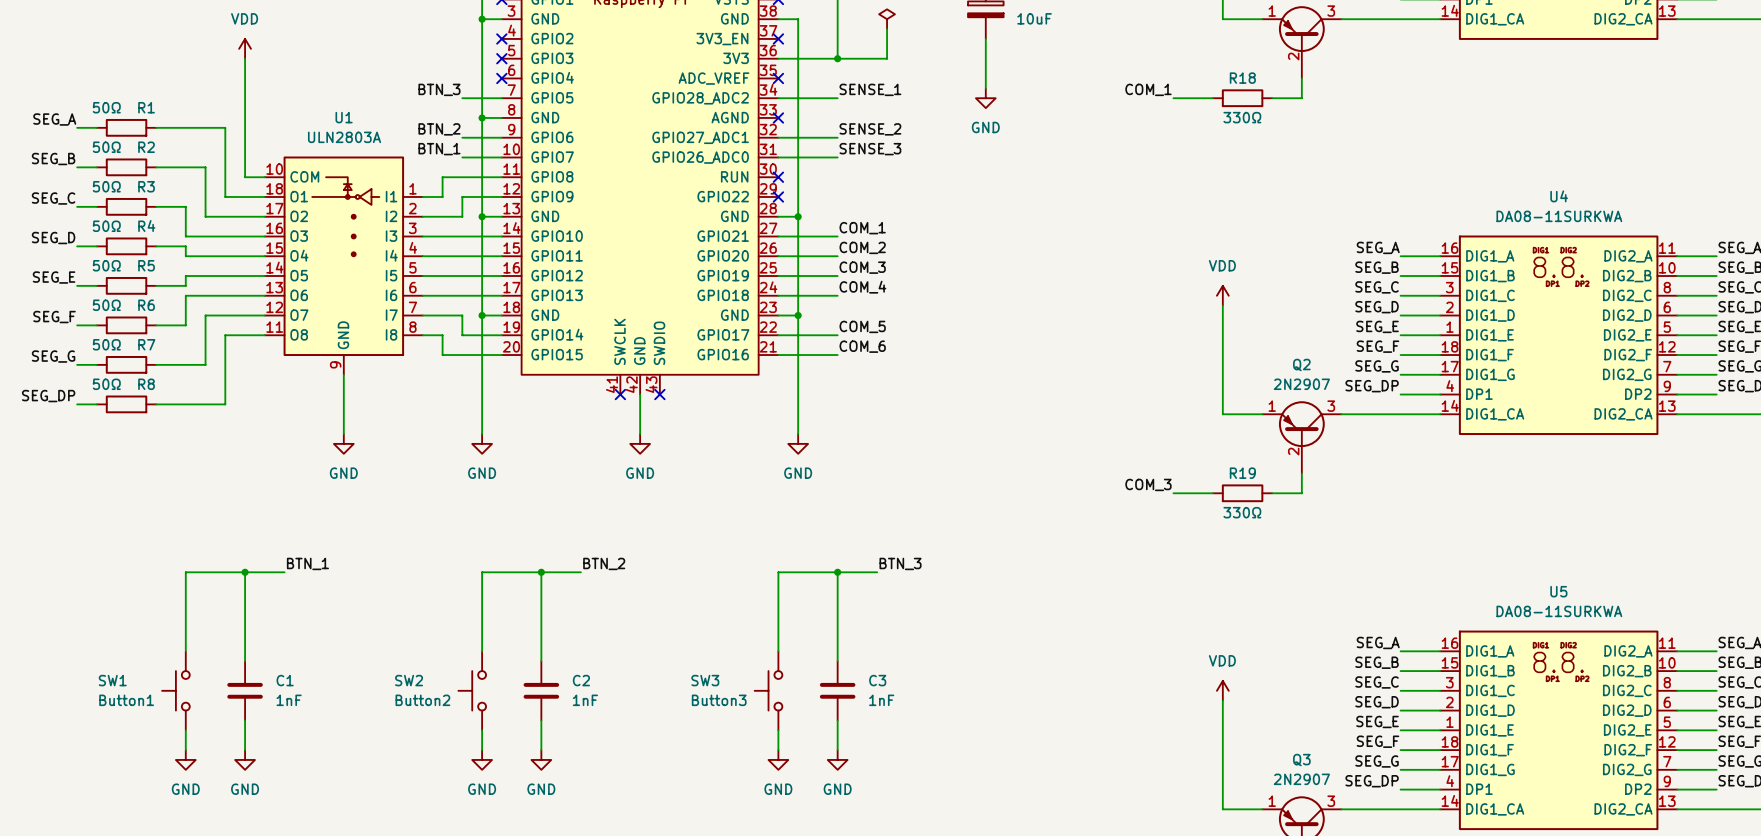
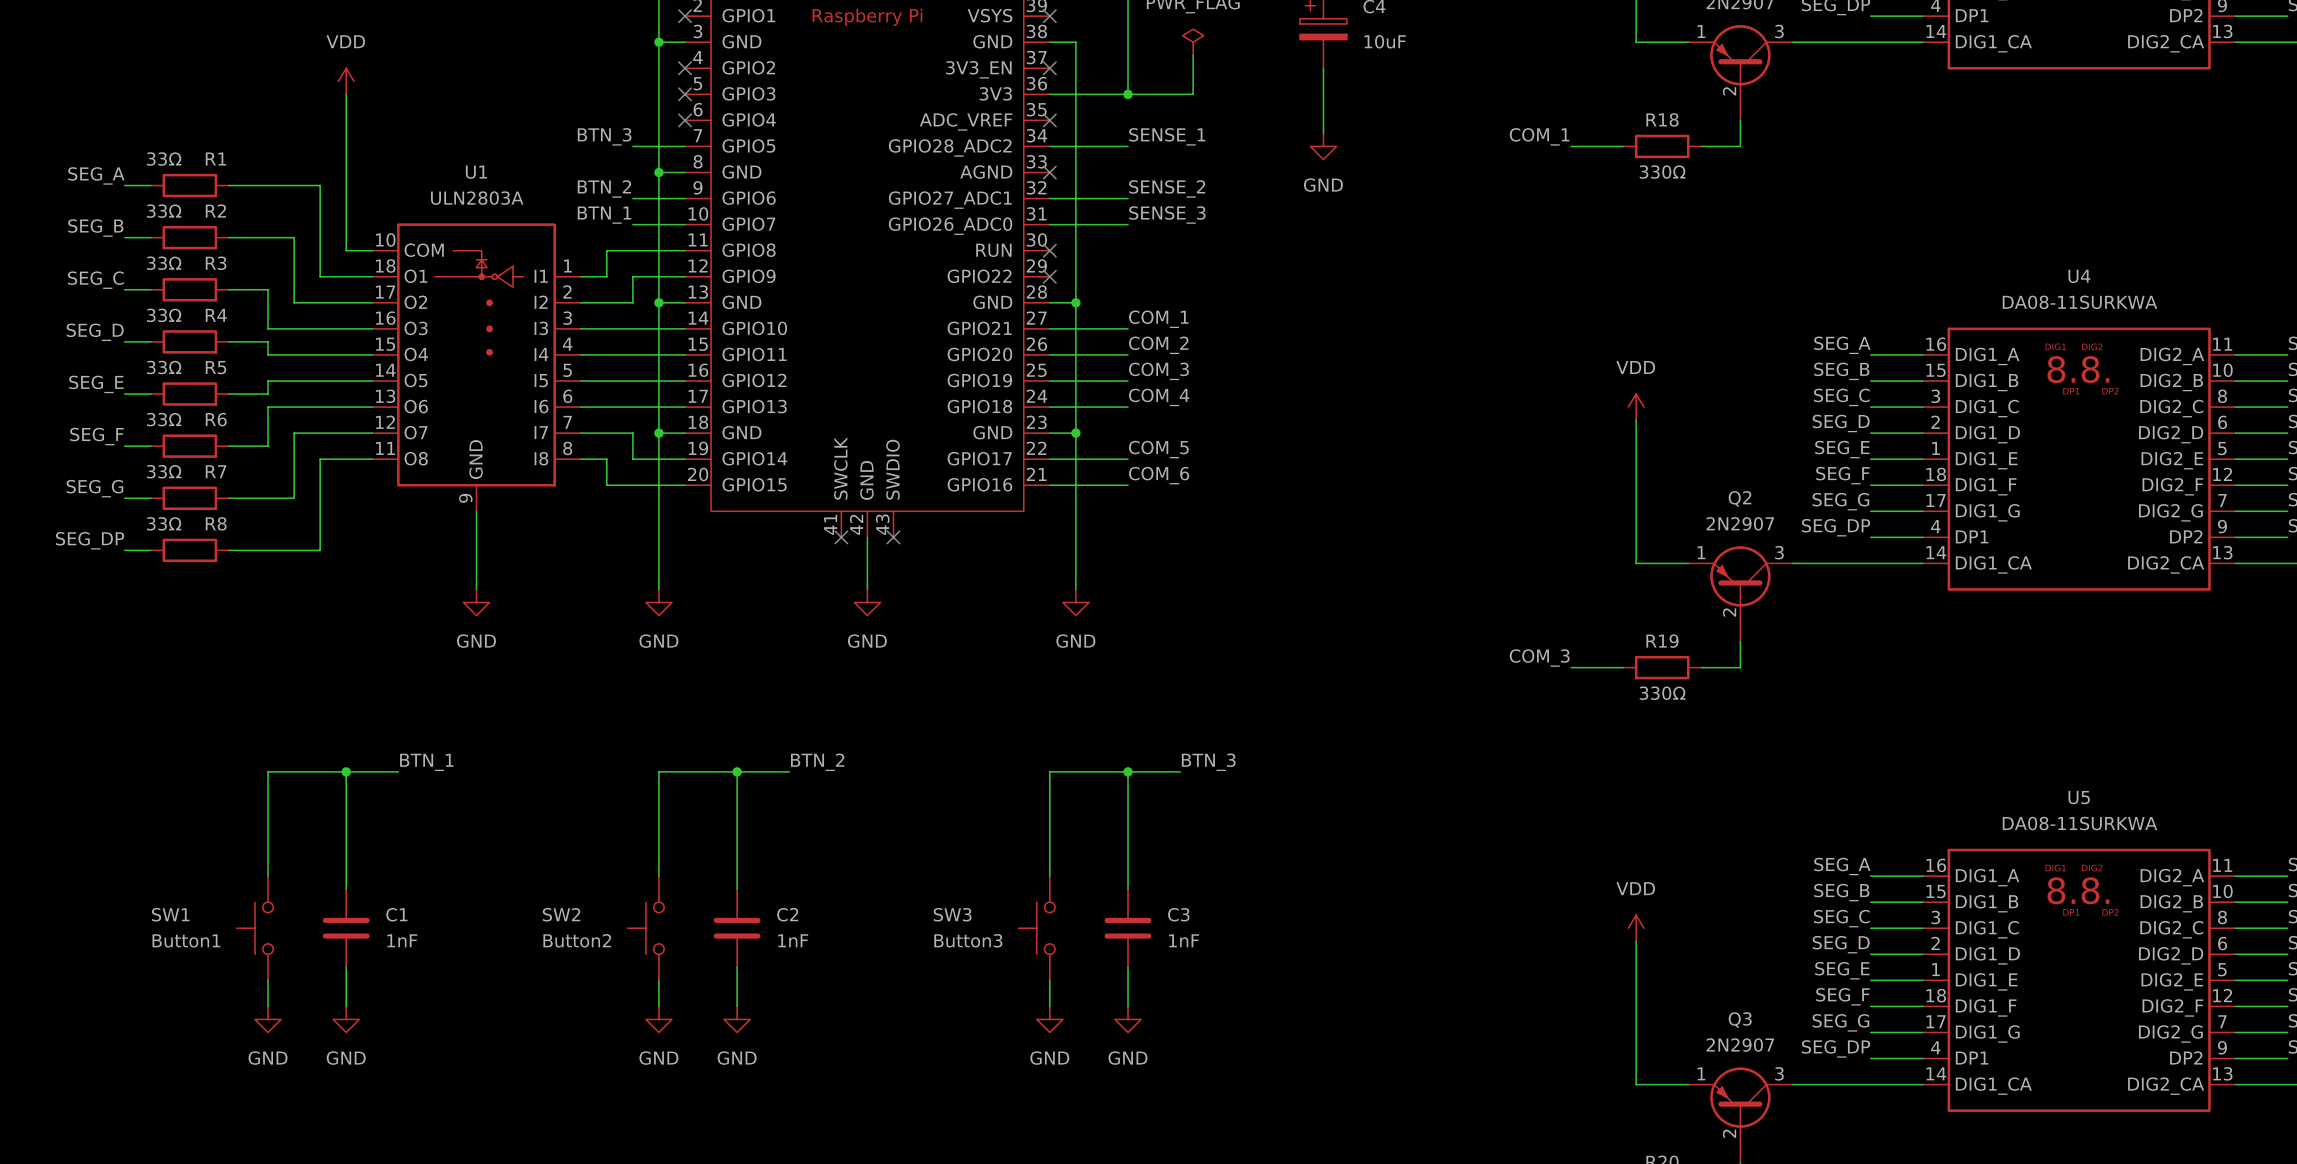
R1 value: 50Ω (106, 107) -> 33Ω (164, 159)
R2 value: 50Ω (106, 147) -> 33Ω (164, 211)
R3 value: 50Ω (106, 186) -> 33Ω (164, 263)
R4 value: 50Ω (106, 226) -> 33Ω (164, 315)
R5 value: 50Ω (106, 265) -> 33Ω (164, 367)
R6 value: 50Ω (106, 305) -> 33Ω (164, 419)
R7 value: 50Ω (106, 344) -> 33Ω (164, 471)
R8 value: 50Ω (106, 384) -> 33Ω (164, 523)

